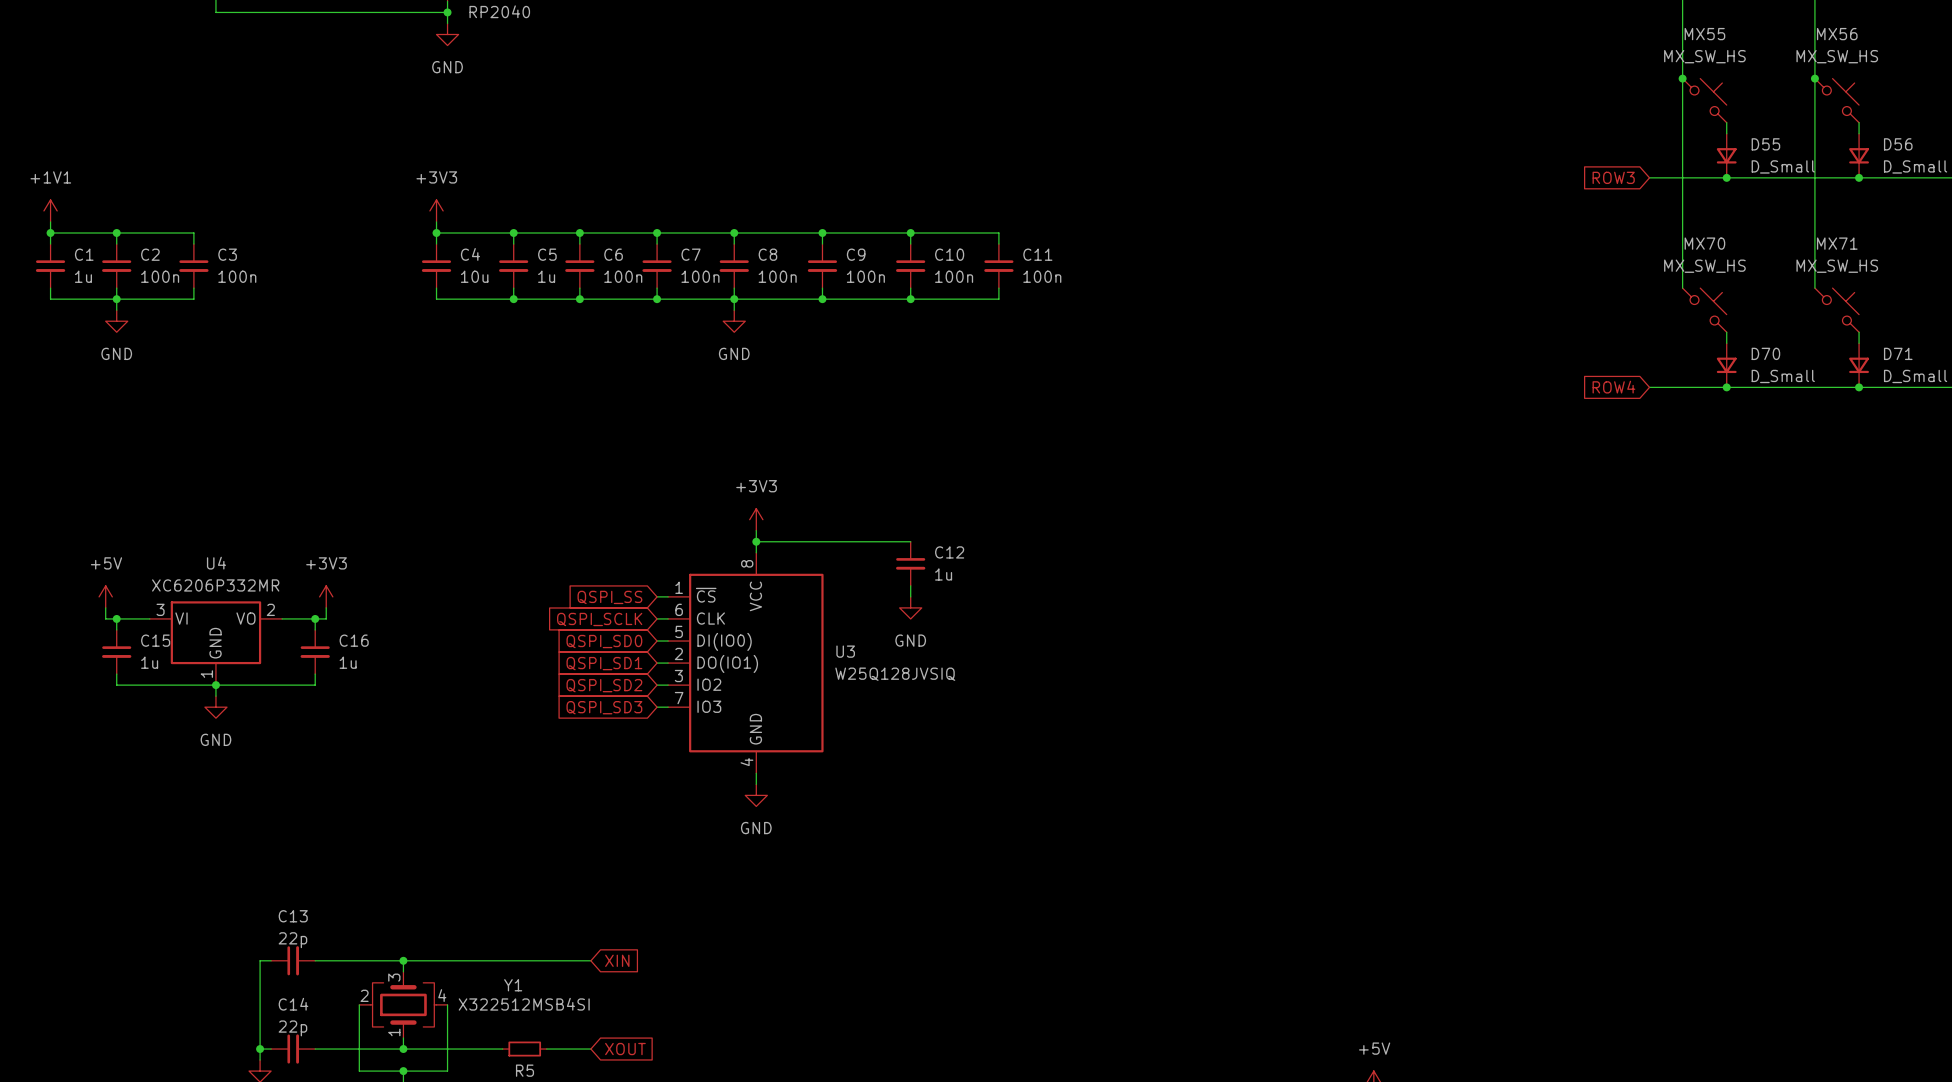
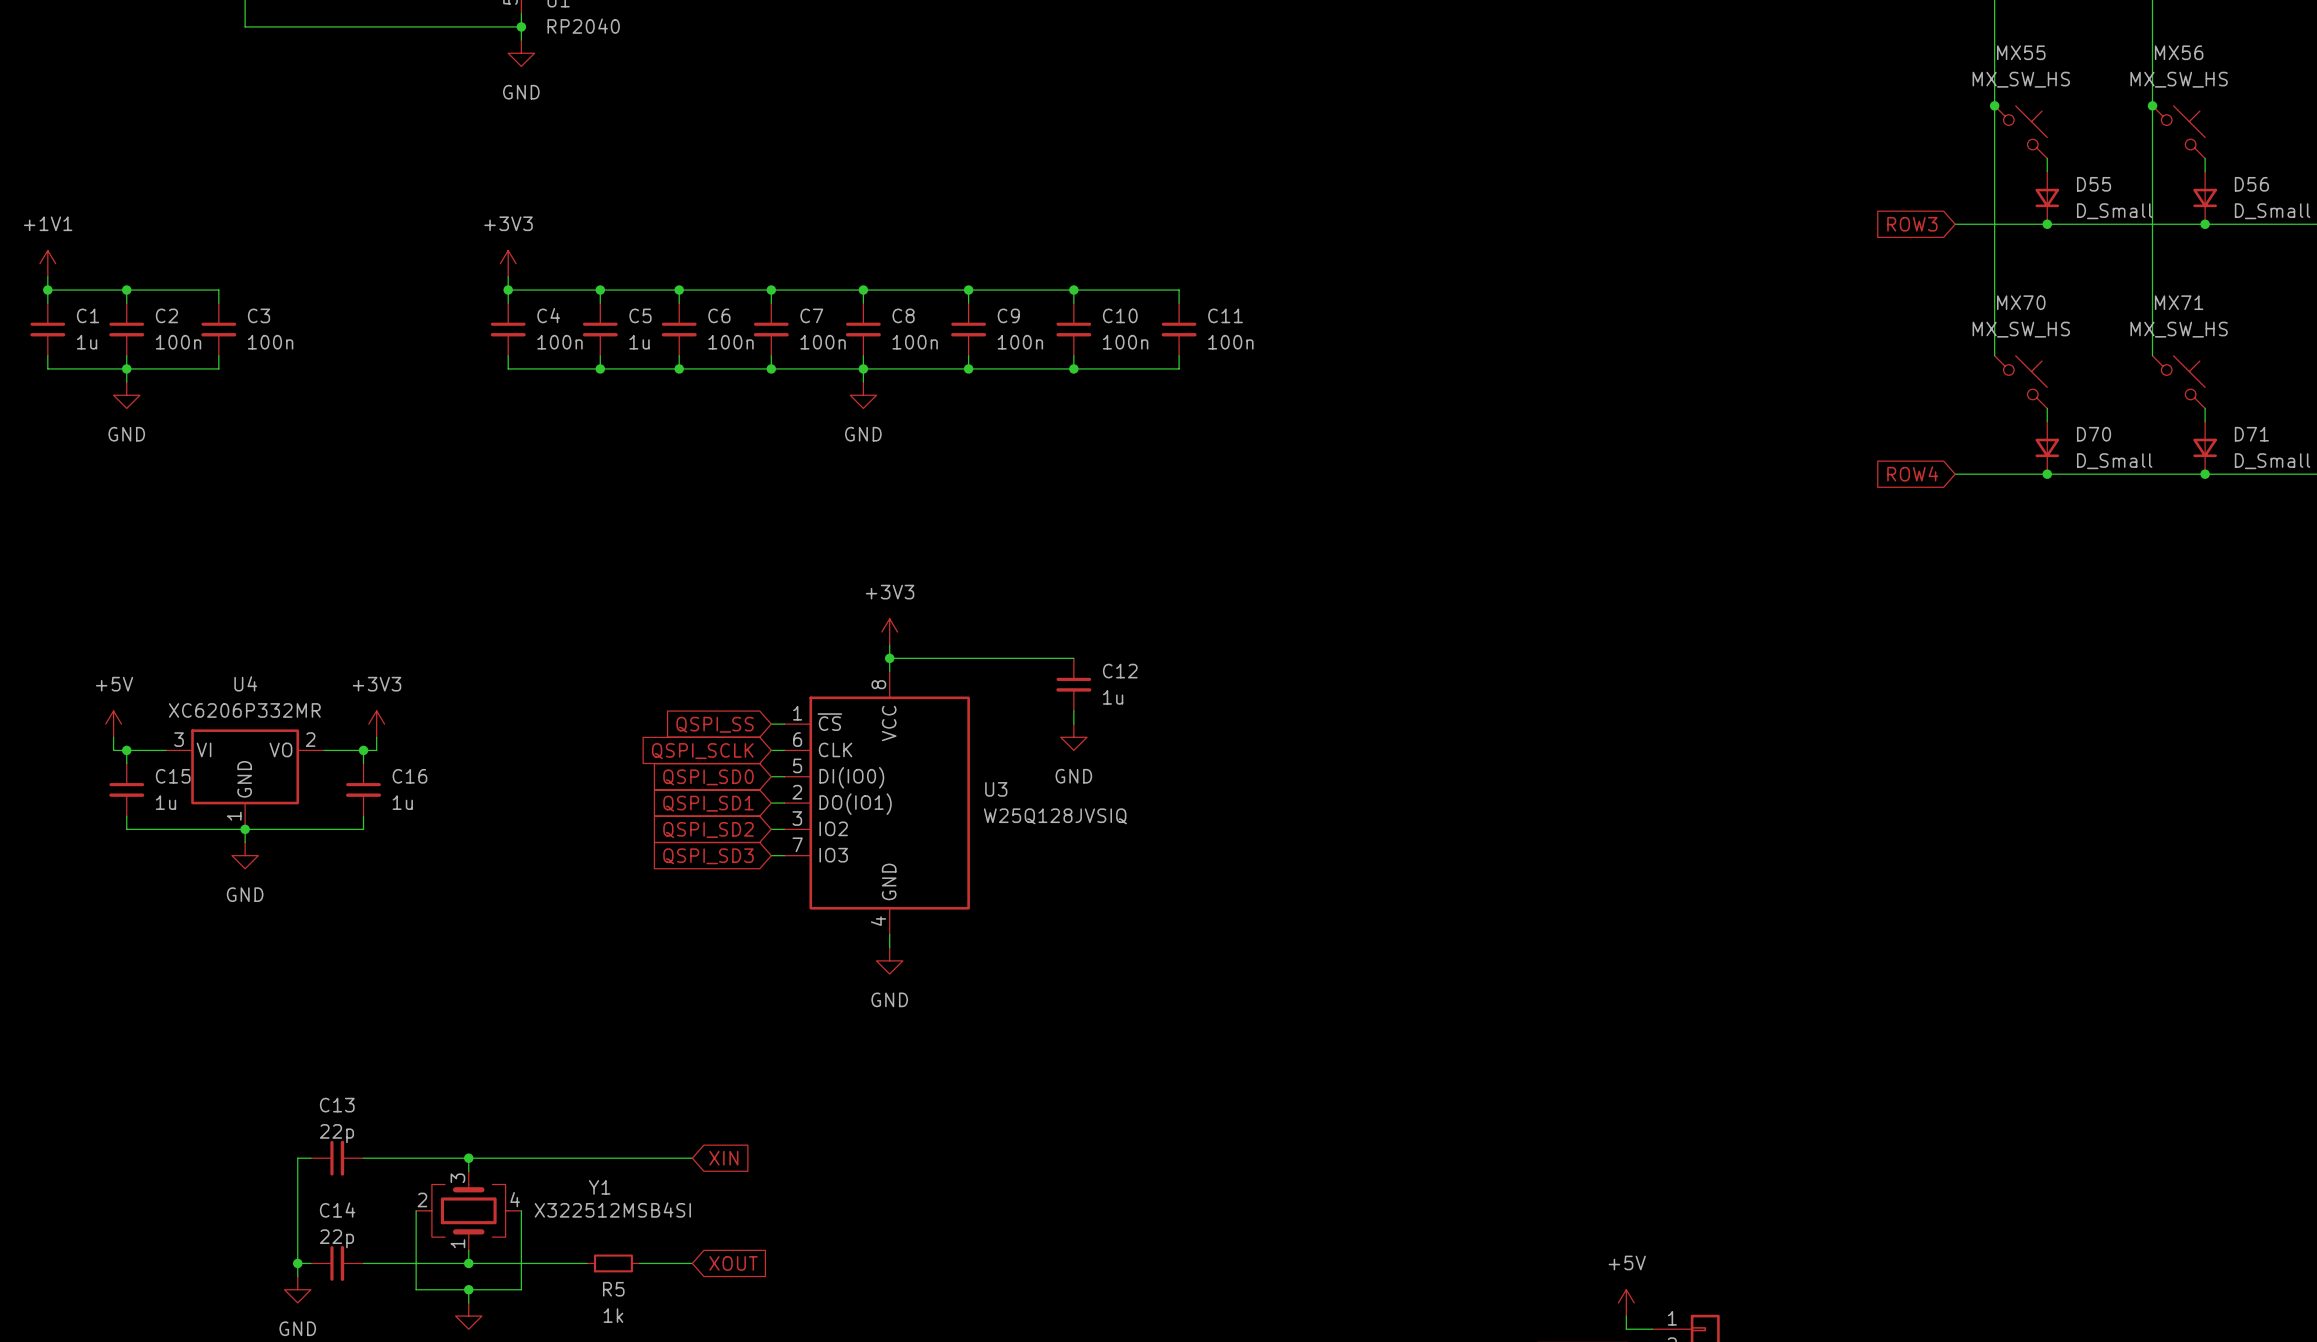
C4 value: 10u (474, 276) -> 100n (559, 342)

